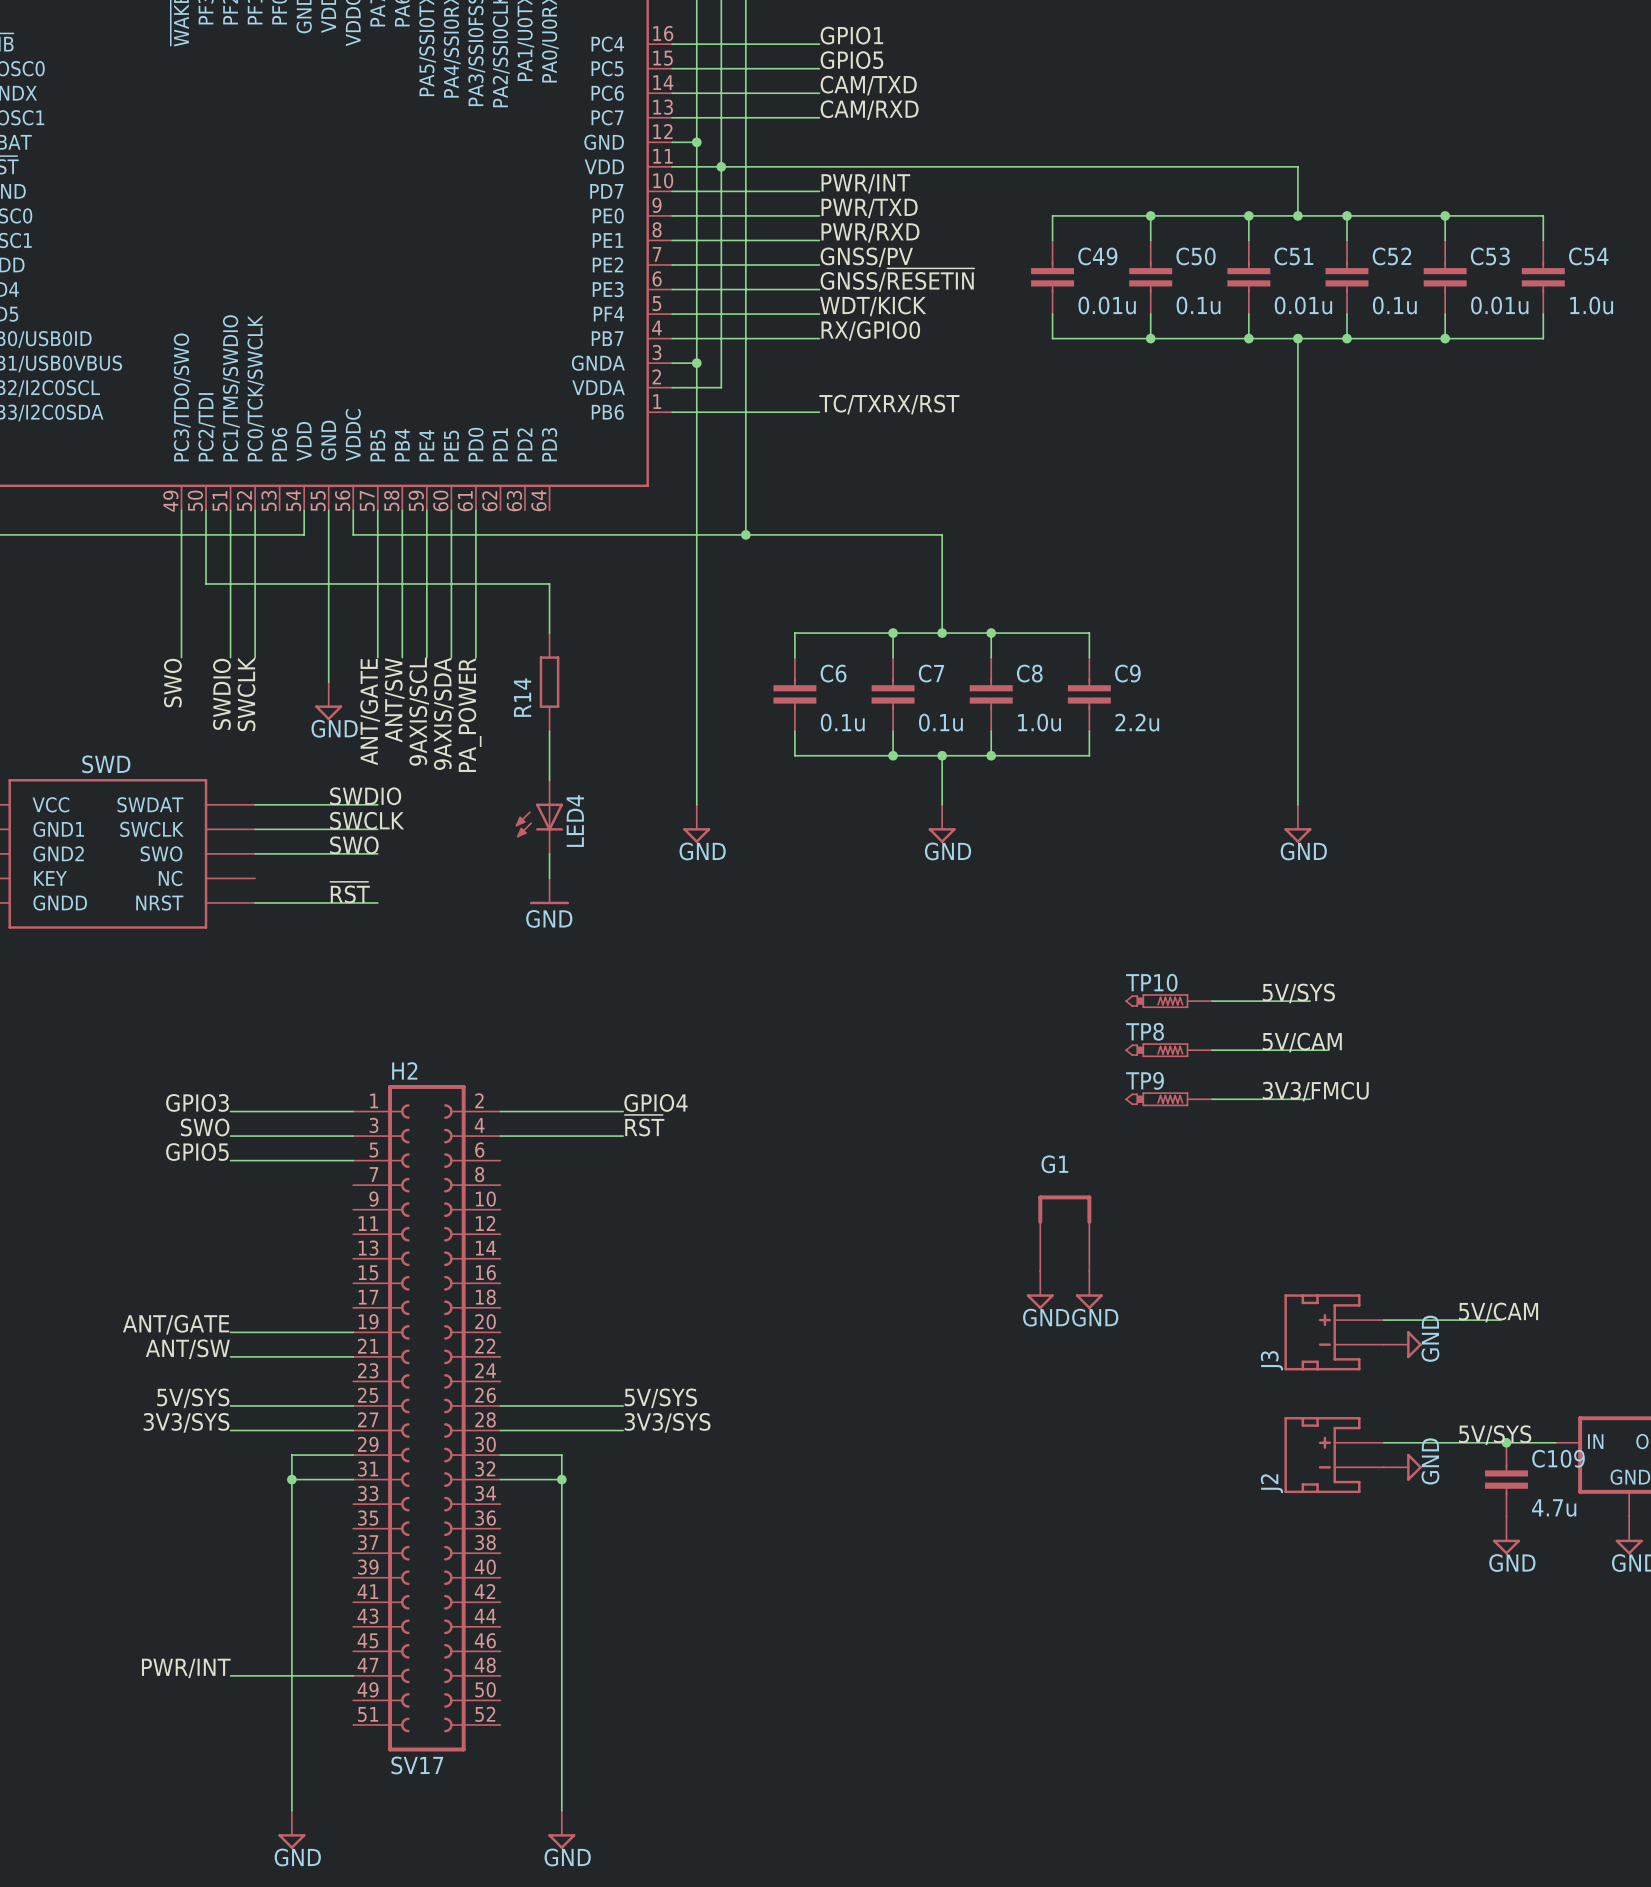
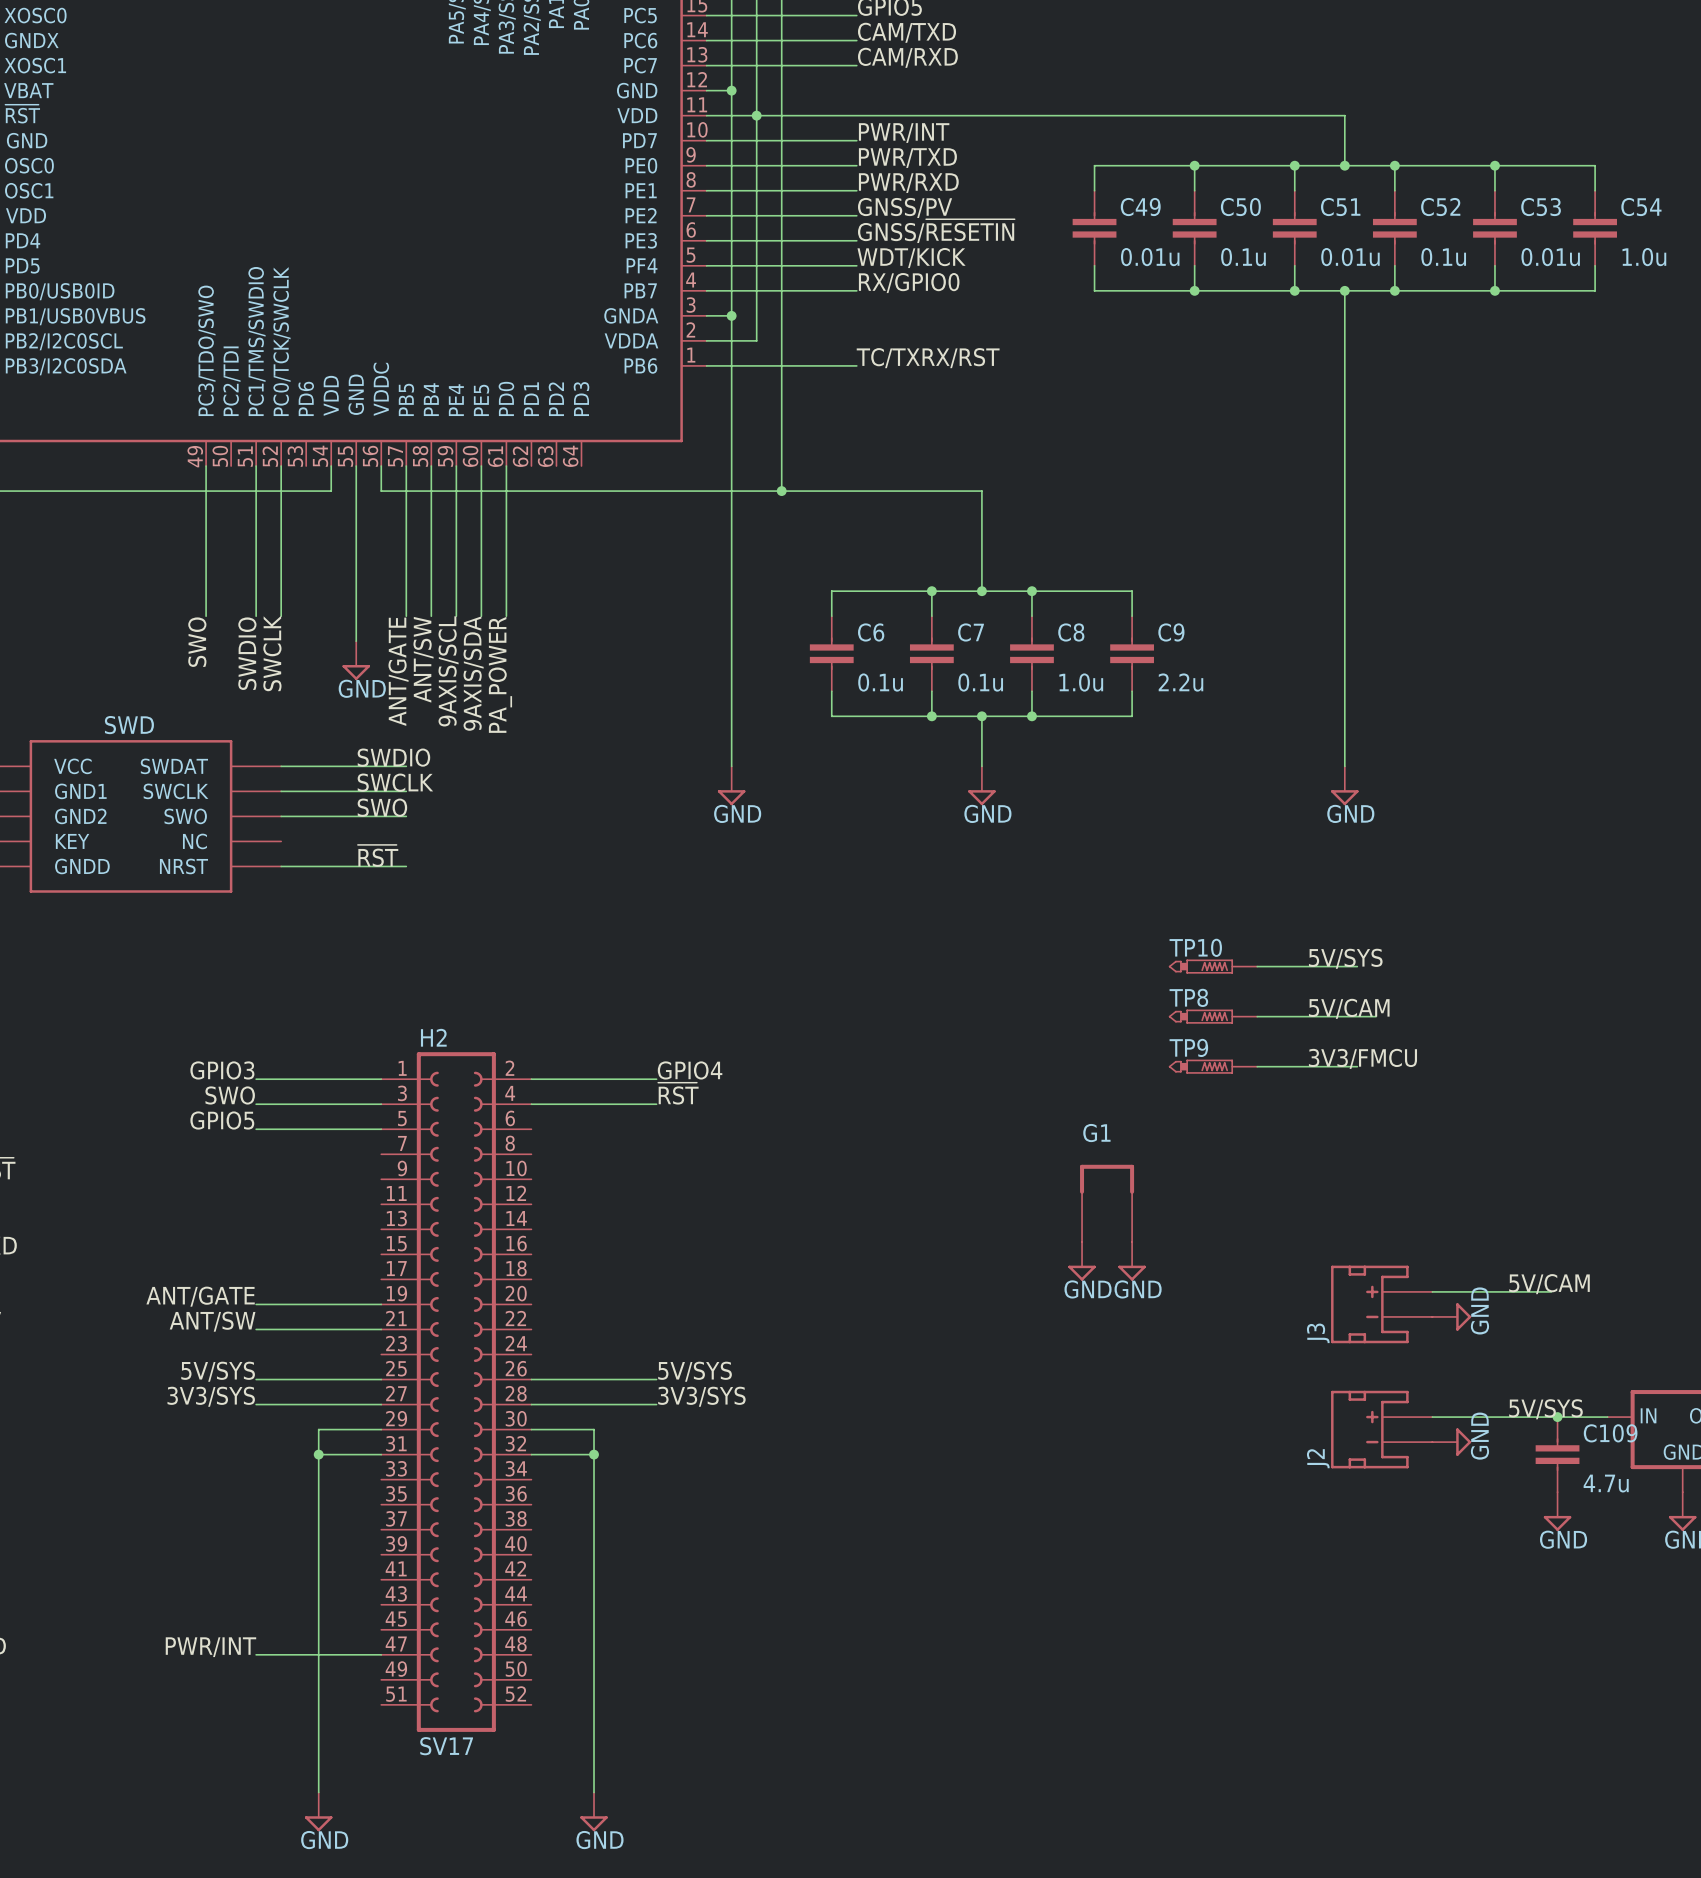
wire: (206, 510) (206, 583) (549, 583) (549, 633) -> none
R14: (549, 682) -> none
wire: (549, 731) (549, 780) -> none
LED4: (539, 817) -> none
wire: (549, 853) (549, 878) -> none
power symbol: GND (549, 891) -> none

